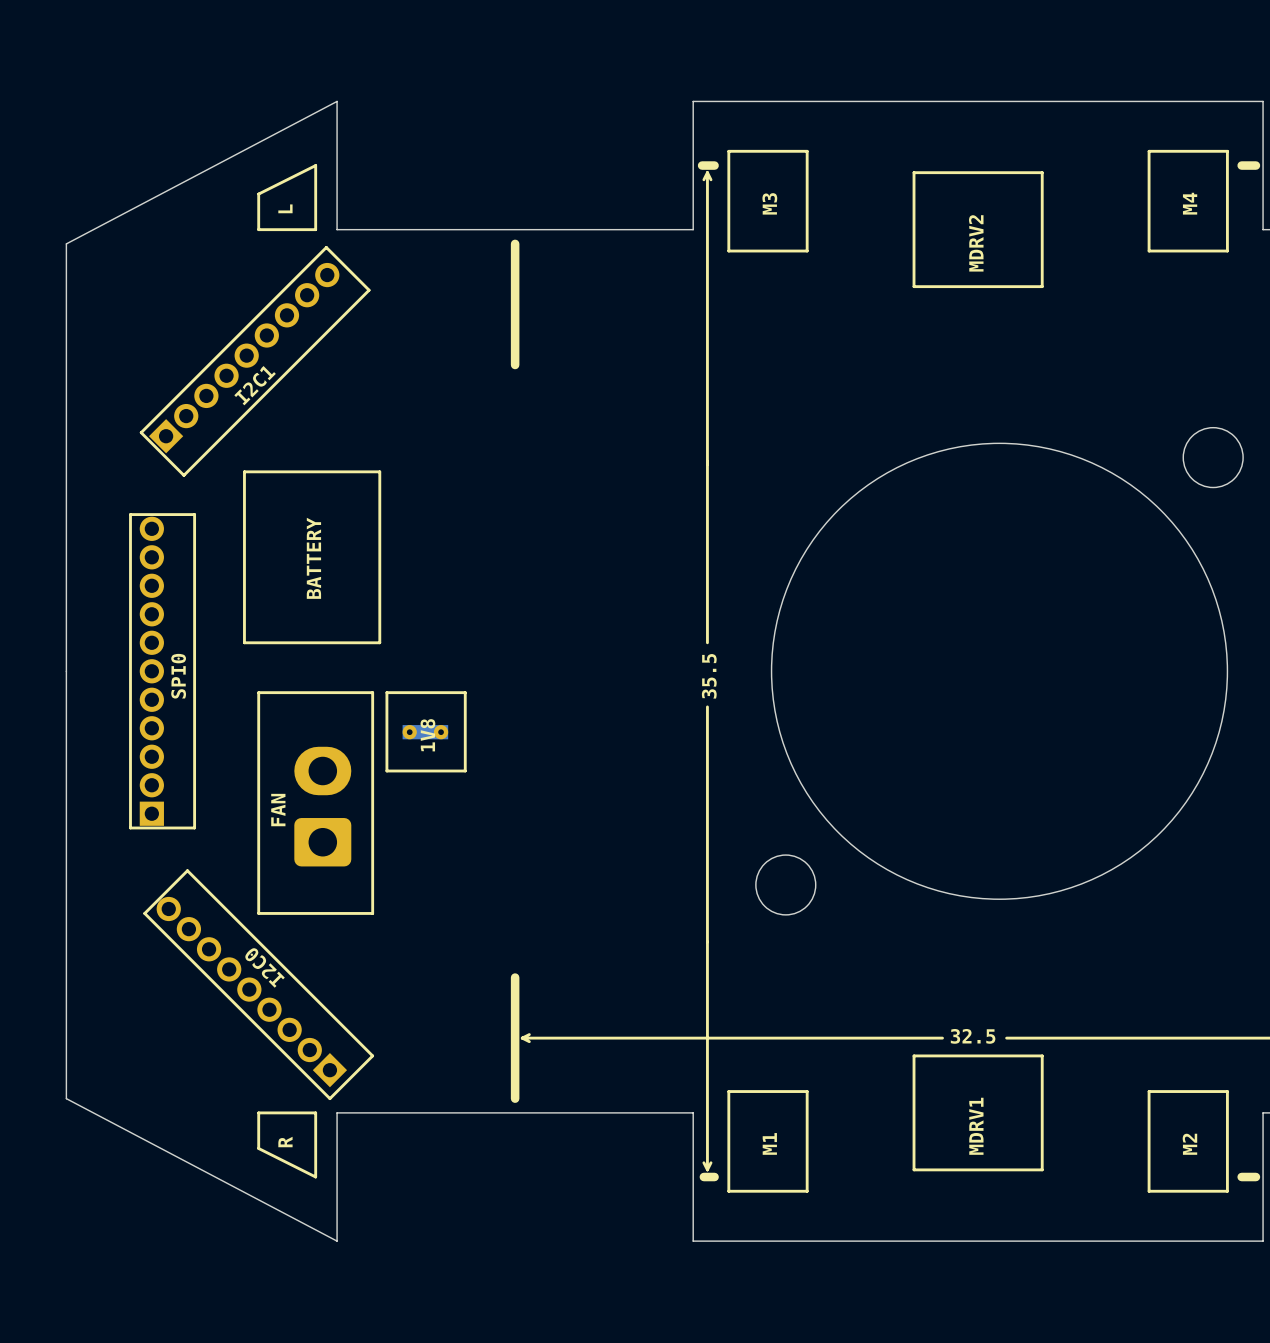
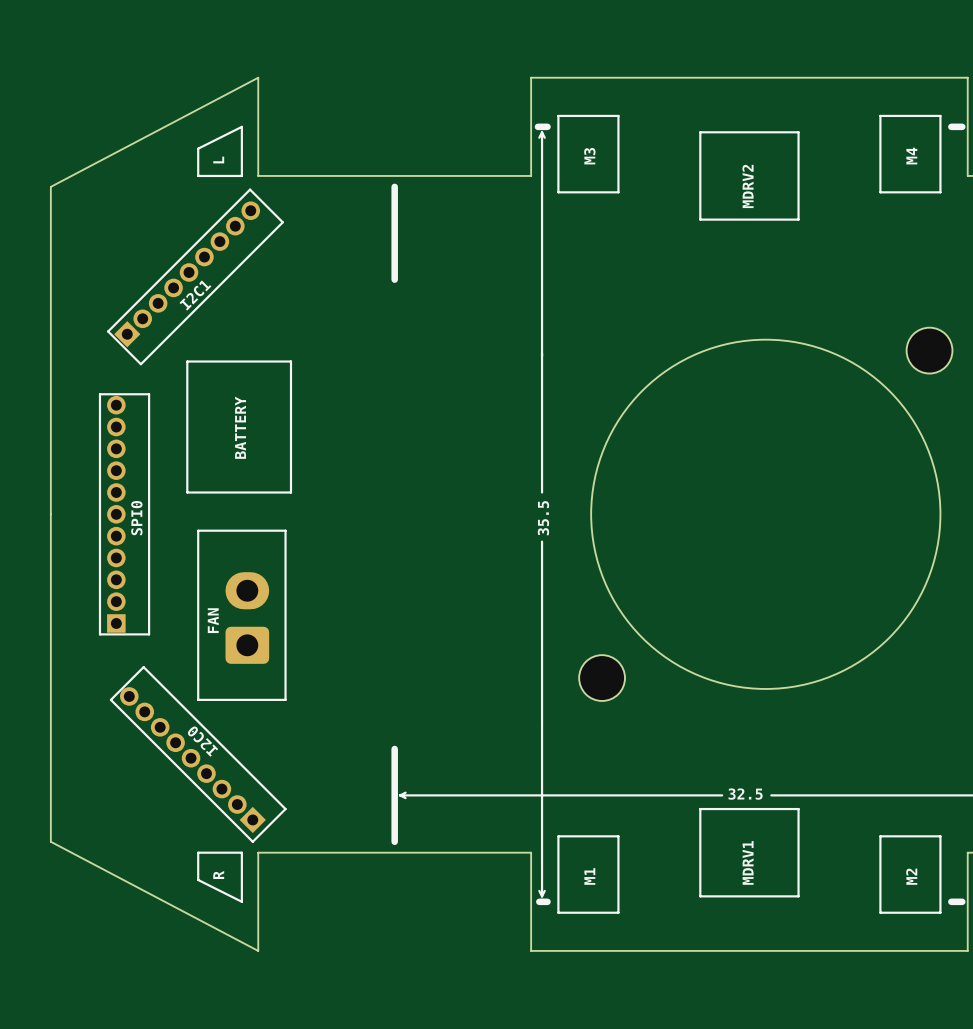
line: (465, 692) (386, 692) (386, 771) (465, 771) (465, 692) -> none
part: (425, 732) -> none
text: 1V8 (427, 735) -> none

